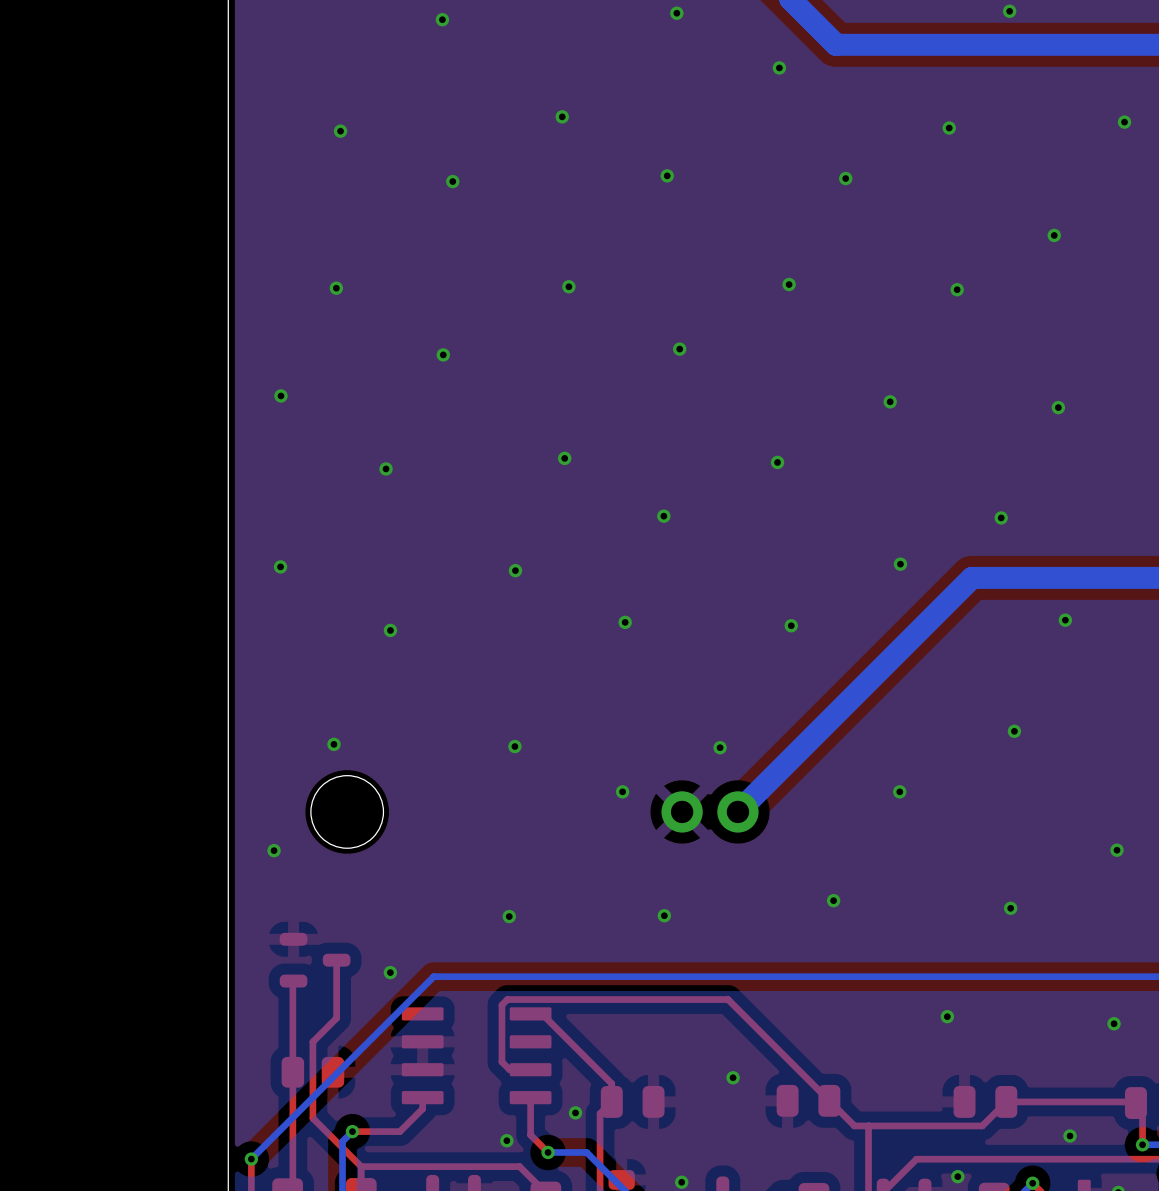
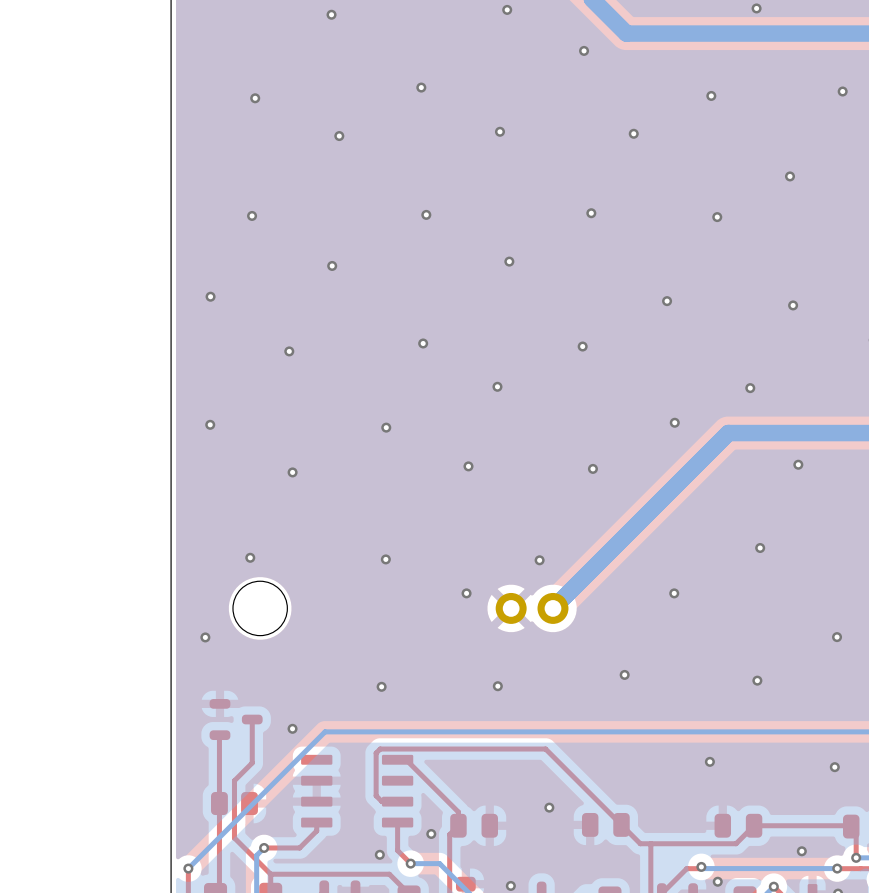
bottom track: none -> (701, 866) (703, 868) (837, 868)
via: none -> (701, 866)
via: none -> (837, 868)

